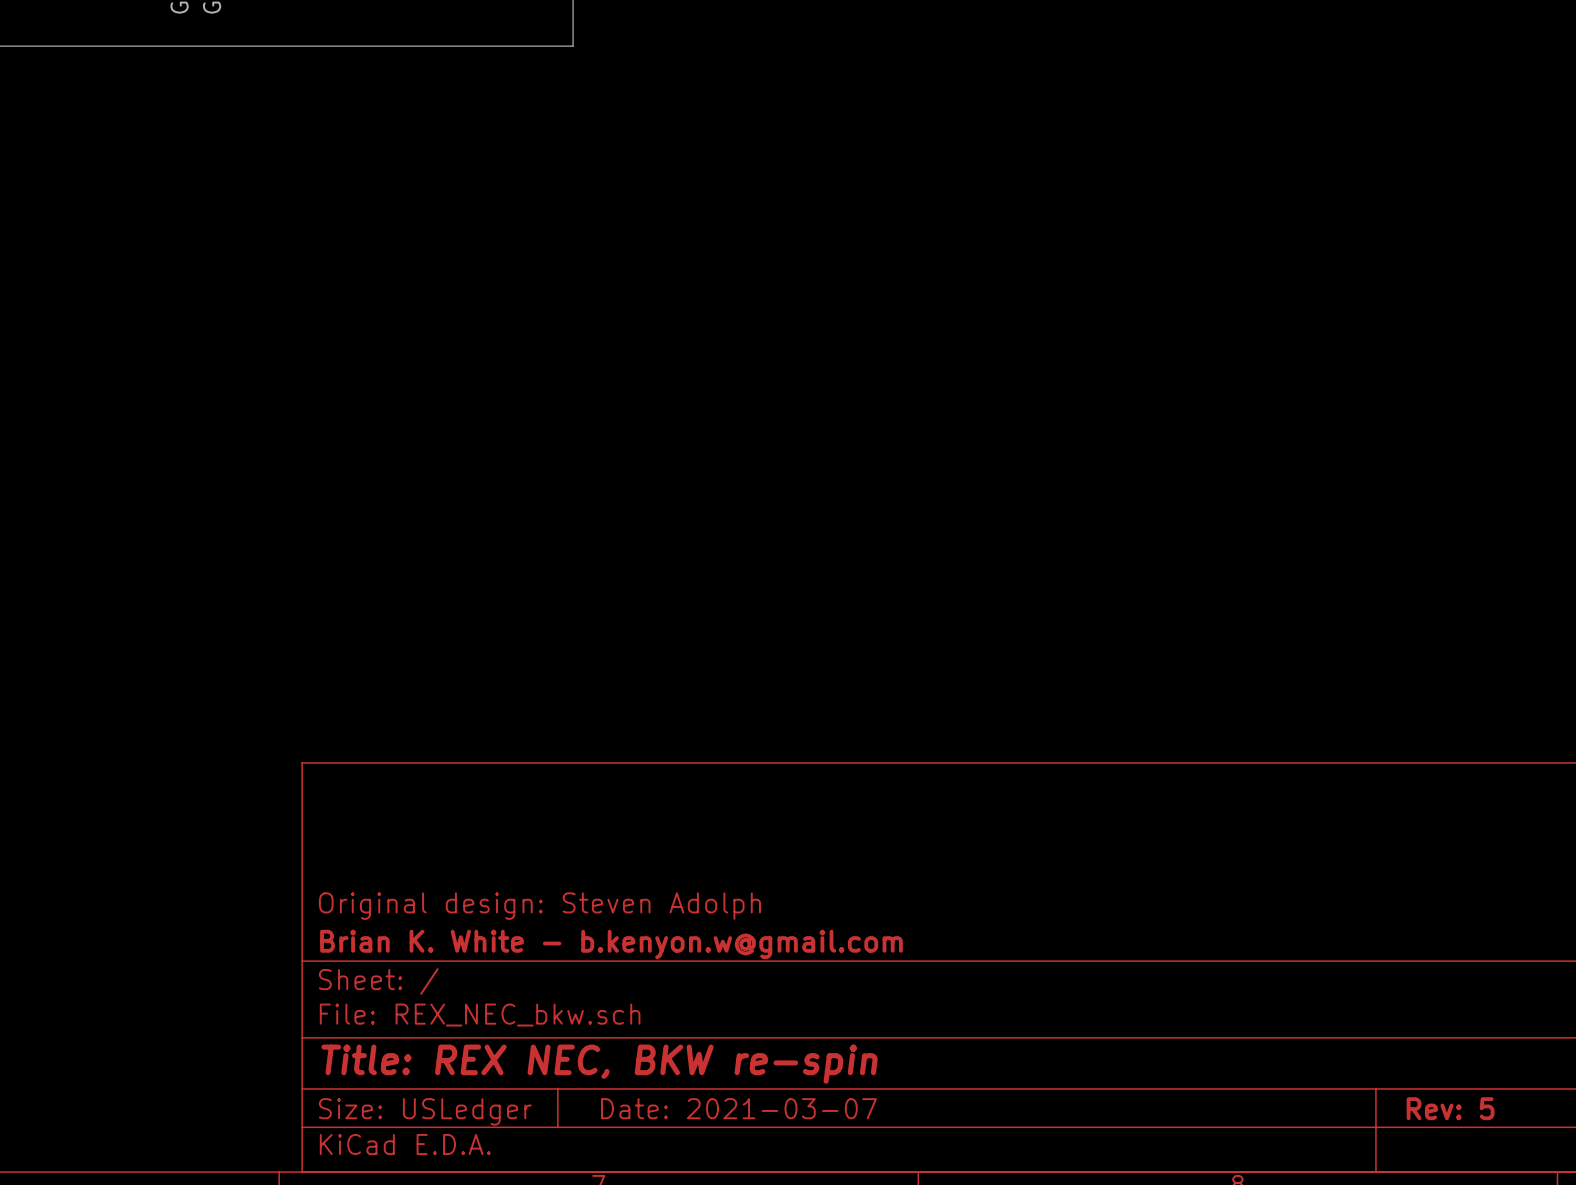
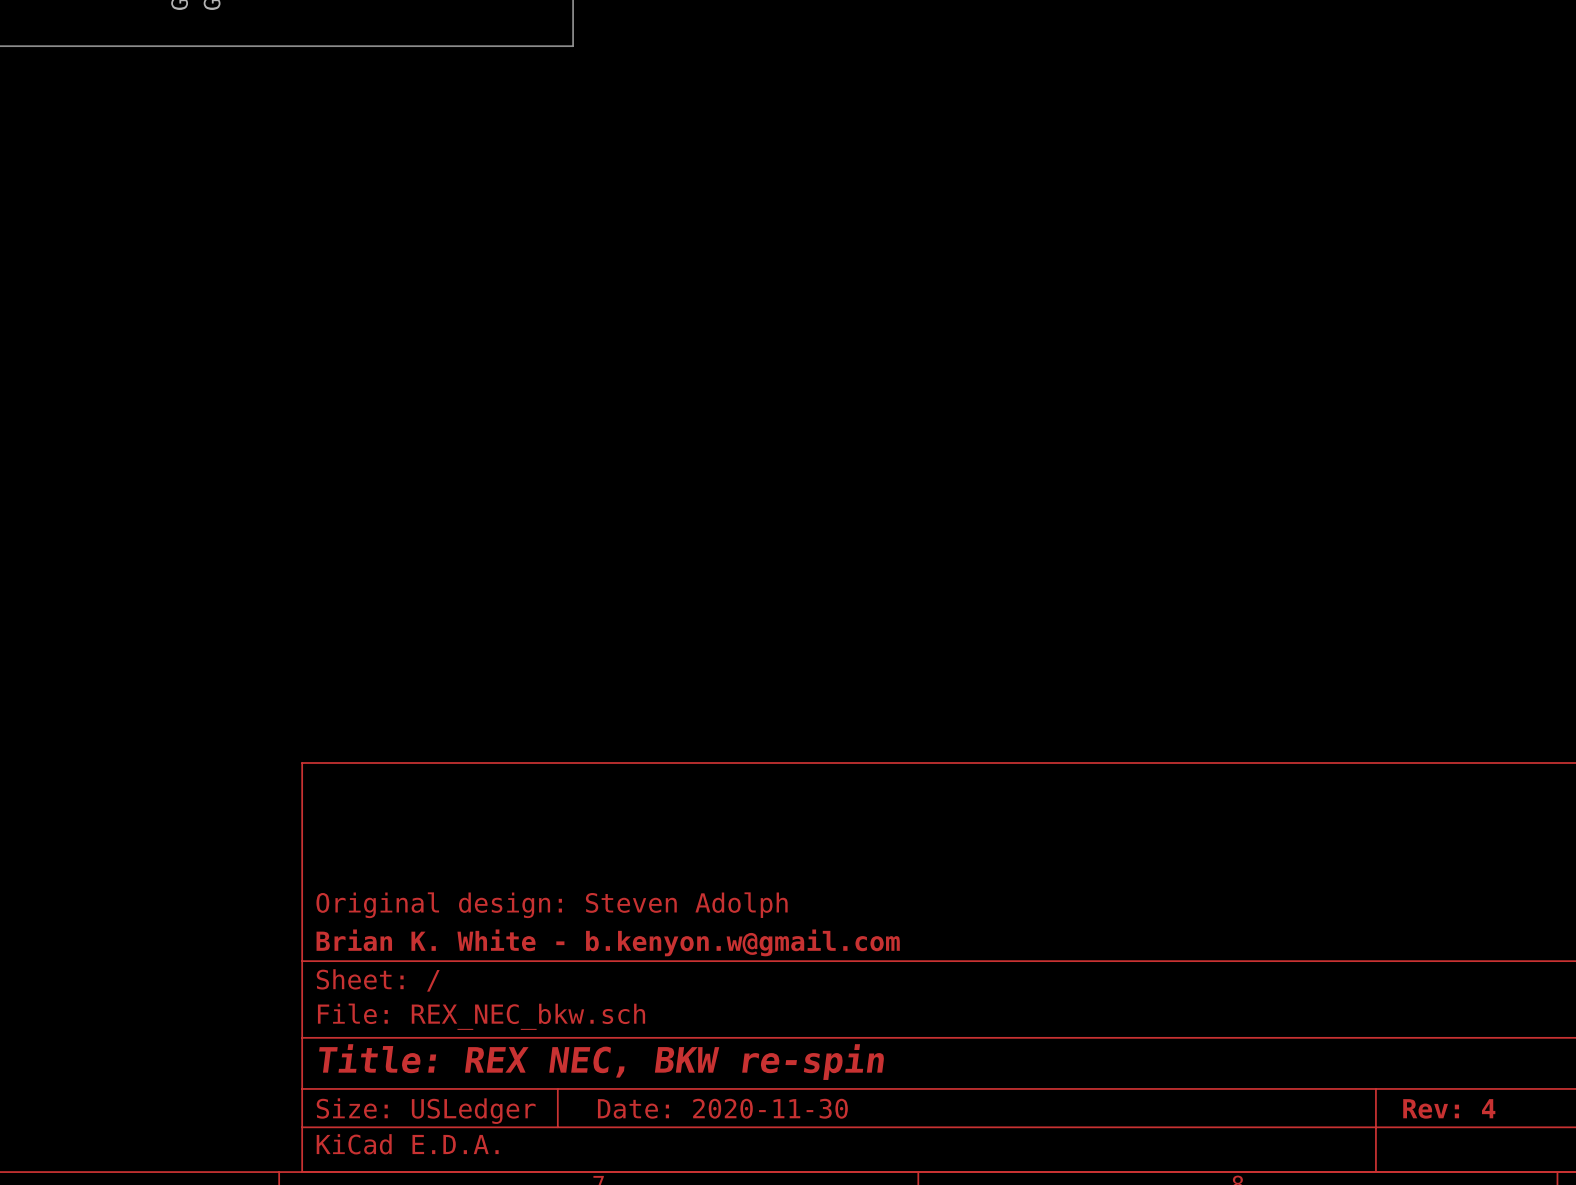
title block: Date: 2021-03-07 (738, 1108) -> Date: 2020-11-30 (722, 1108)
title block: Rev: 5 (1450, 1108) -> Rev: 4 (1449, 1108)

